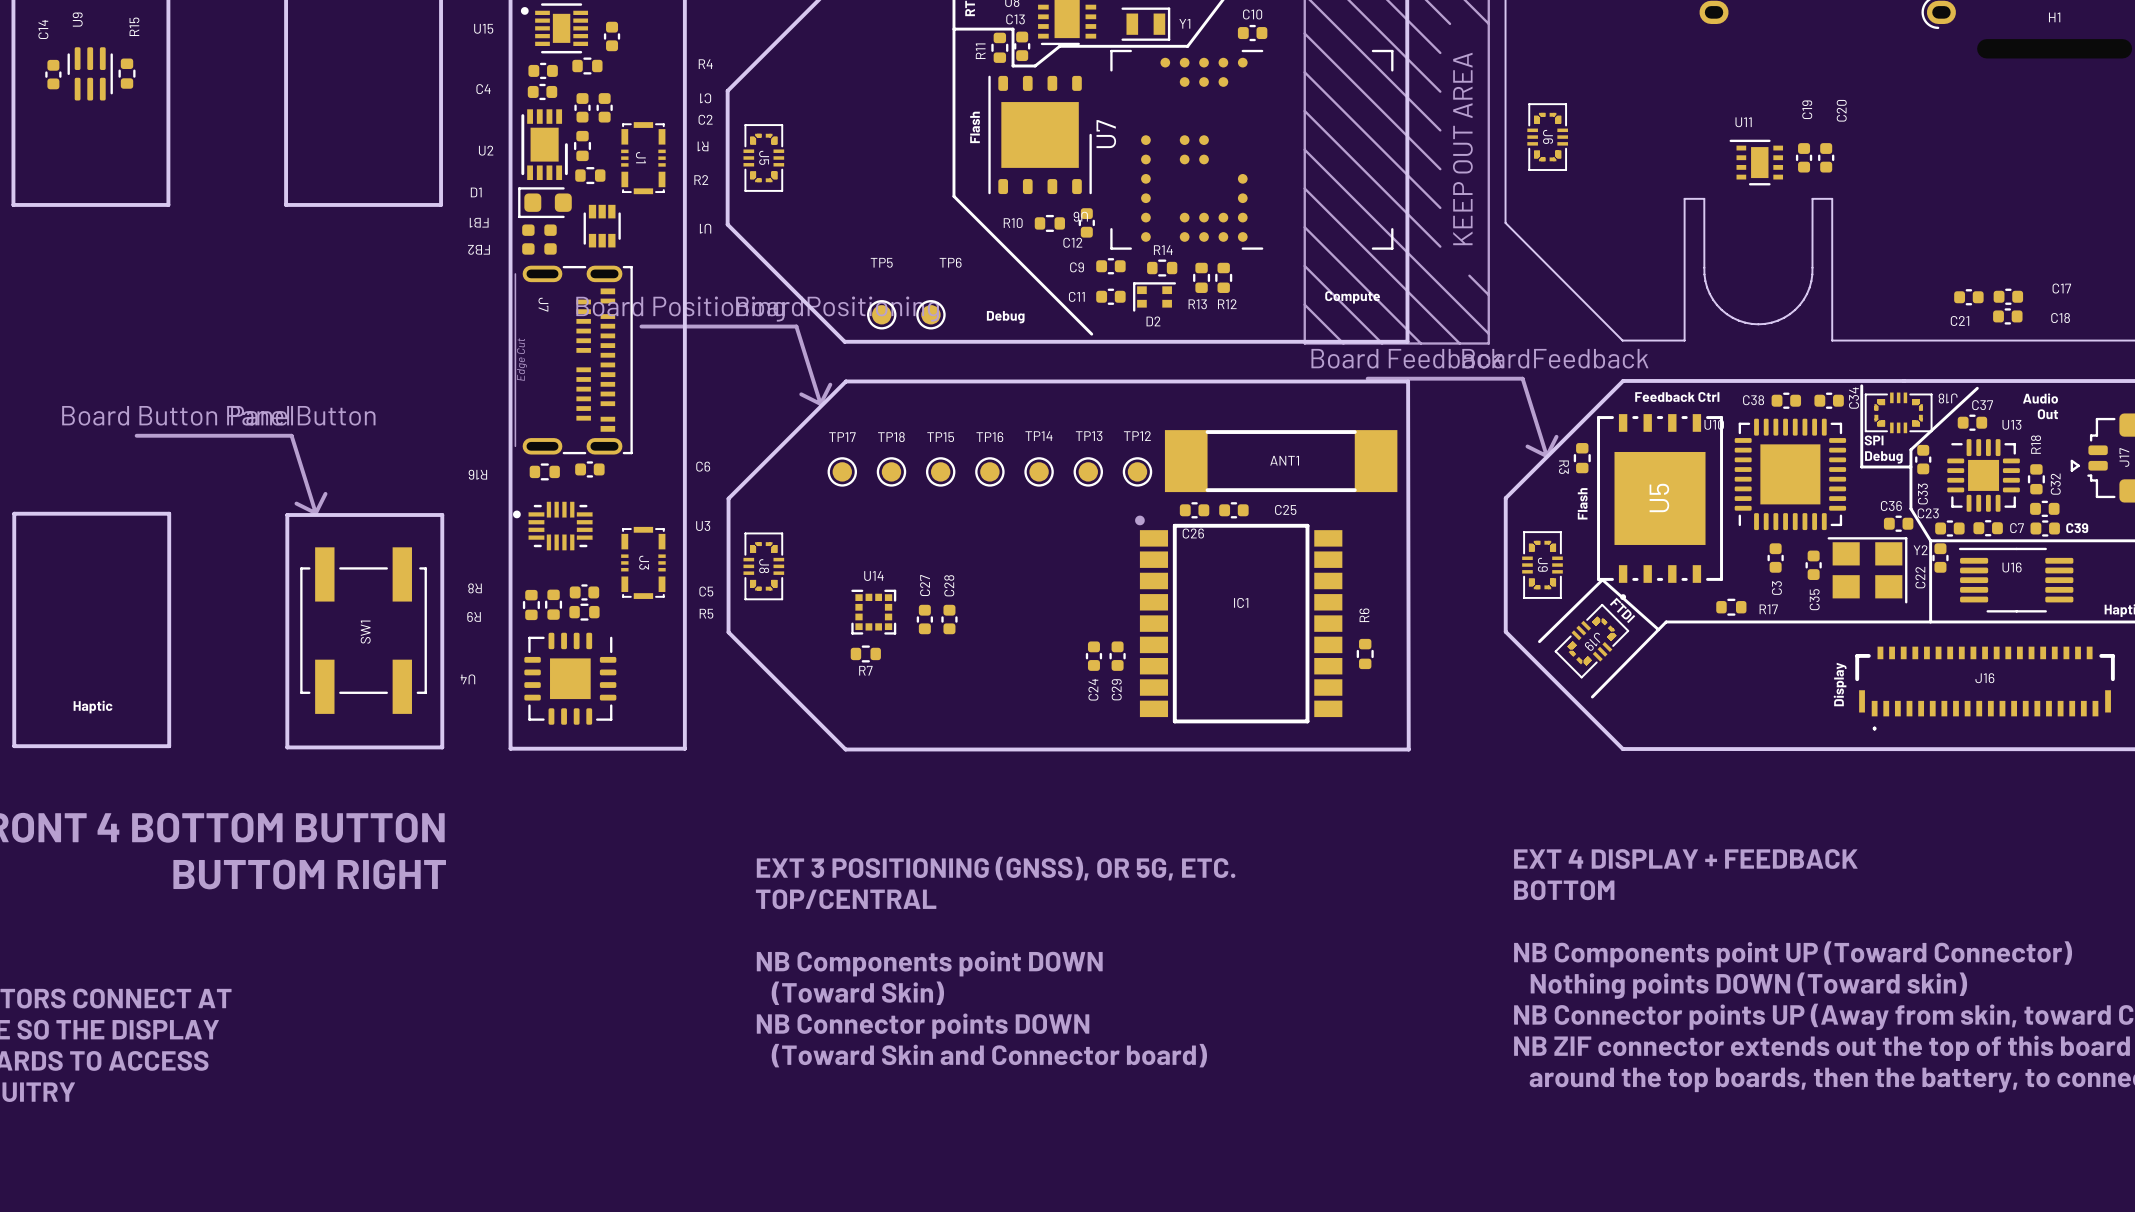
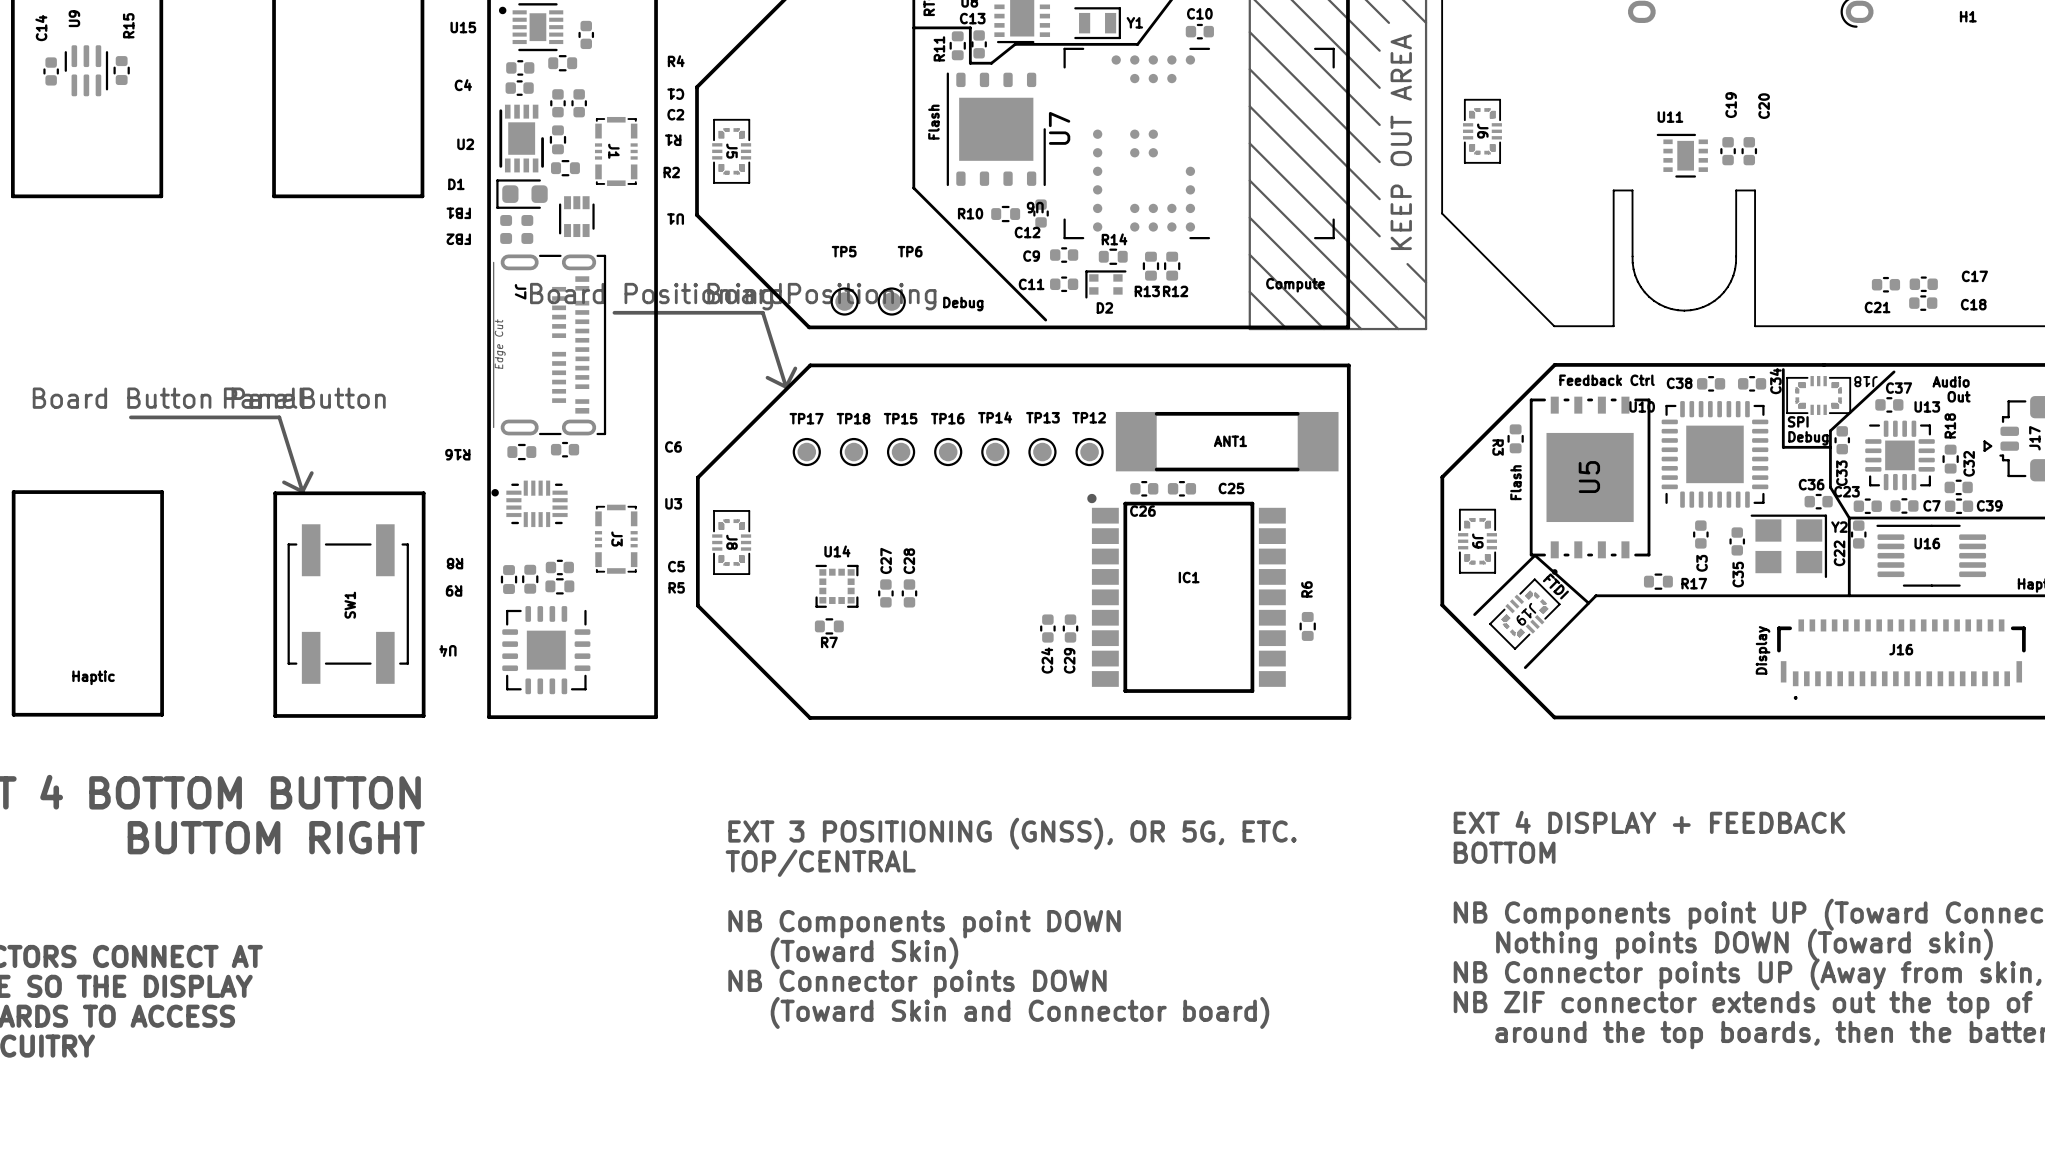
BoardFeedback: Board Feedback (1462, 417) -> none

